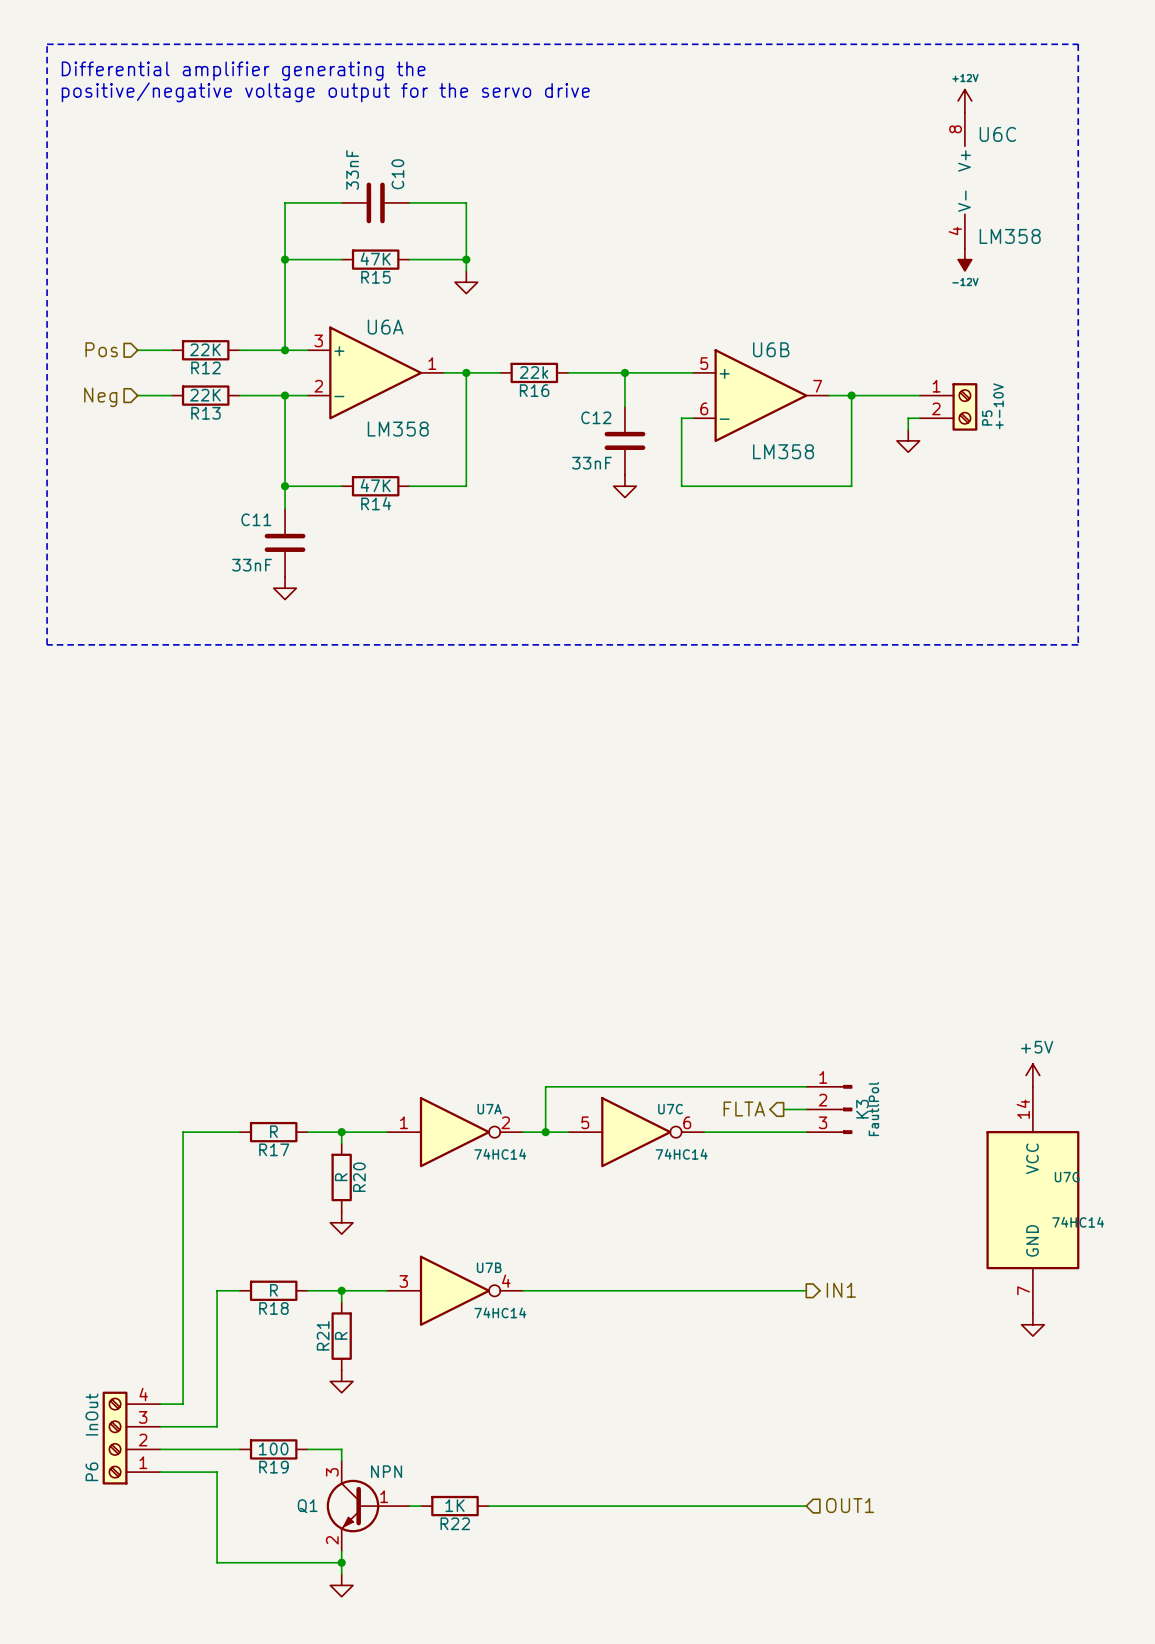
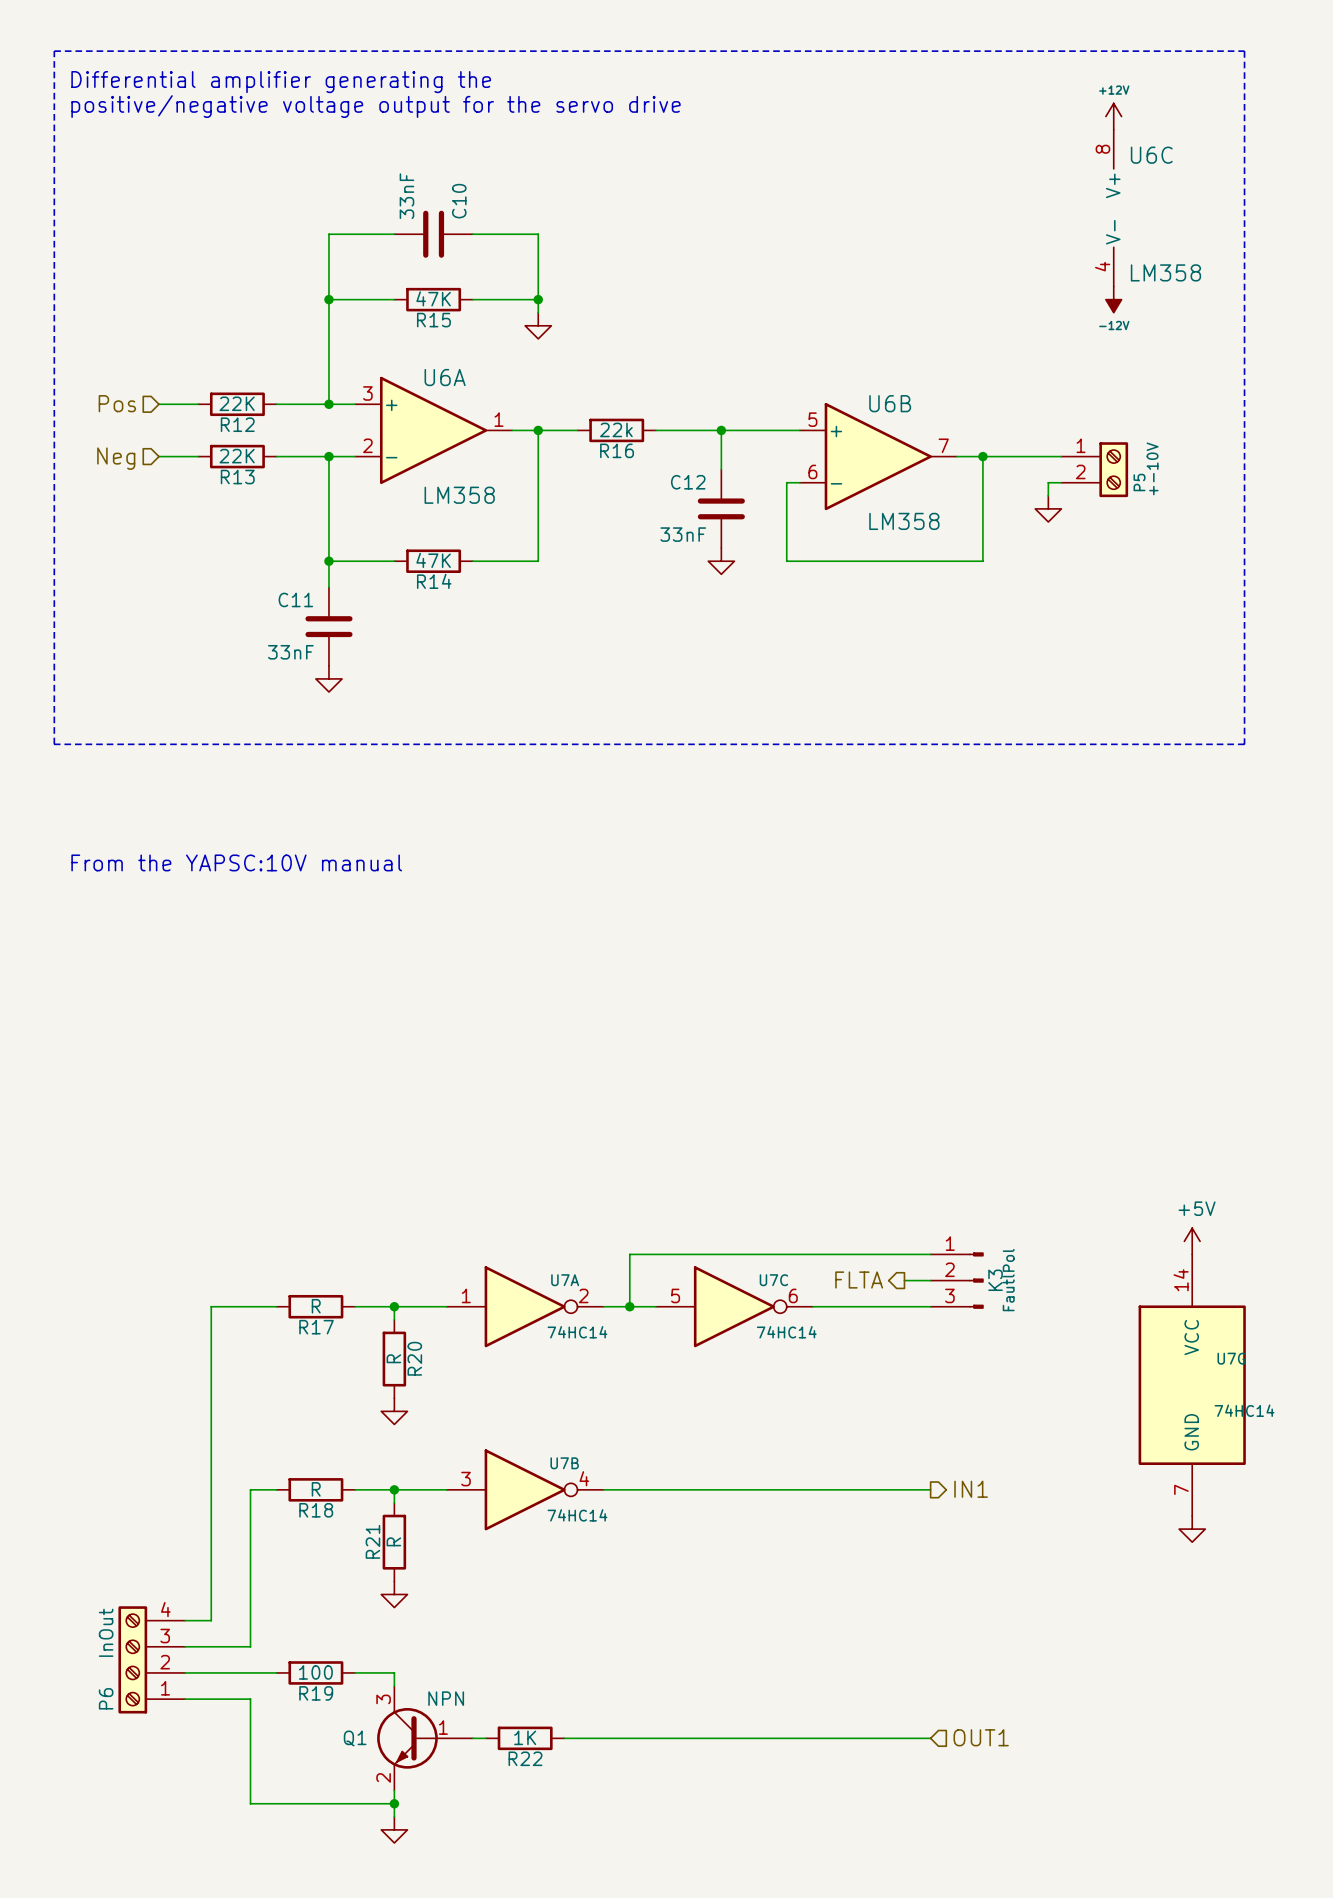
text: none -> From the YAPSC:10V manual (236, 862)

